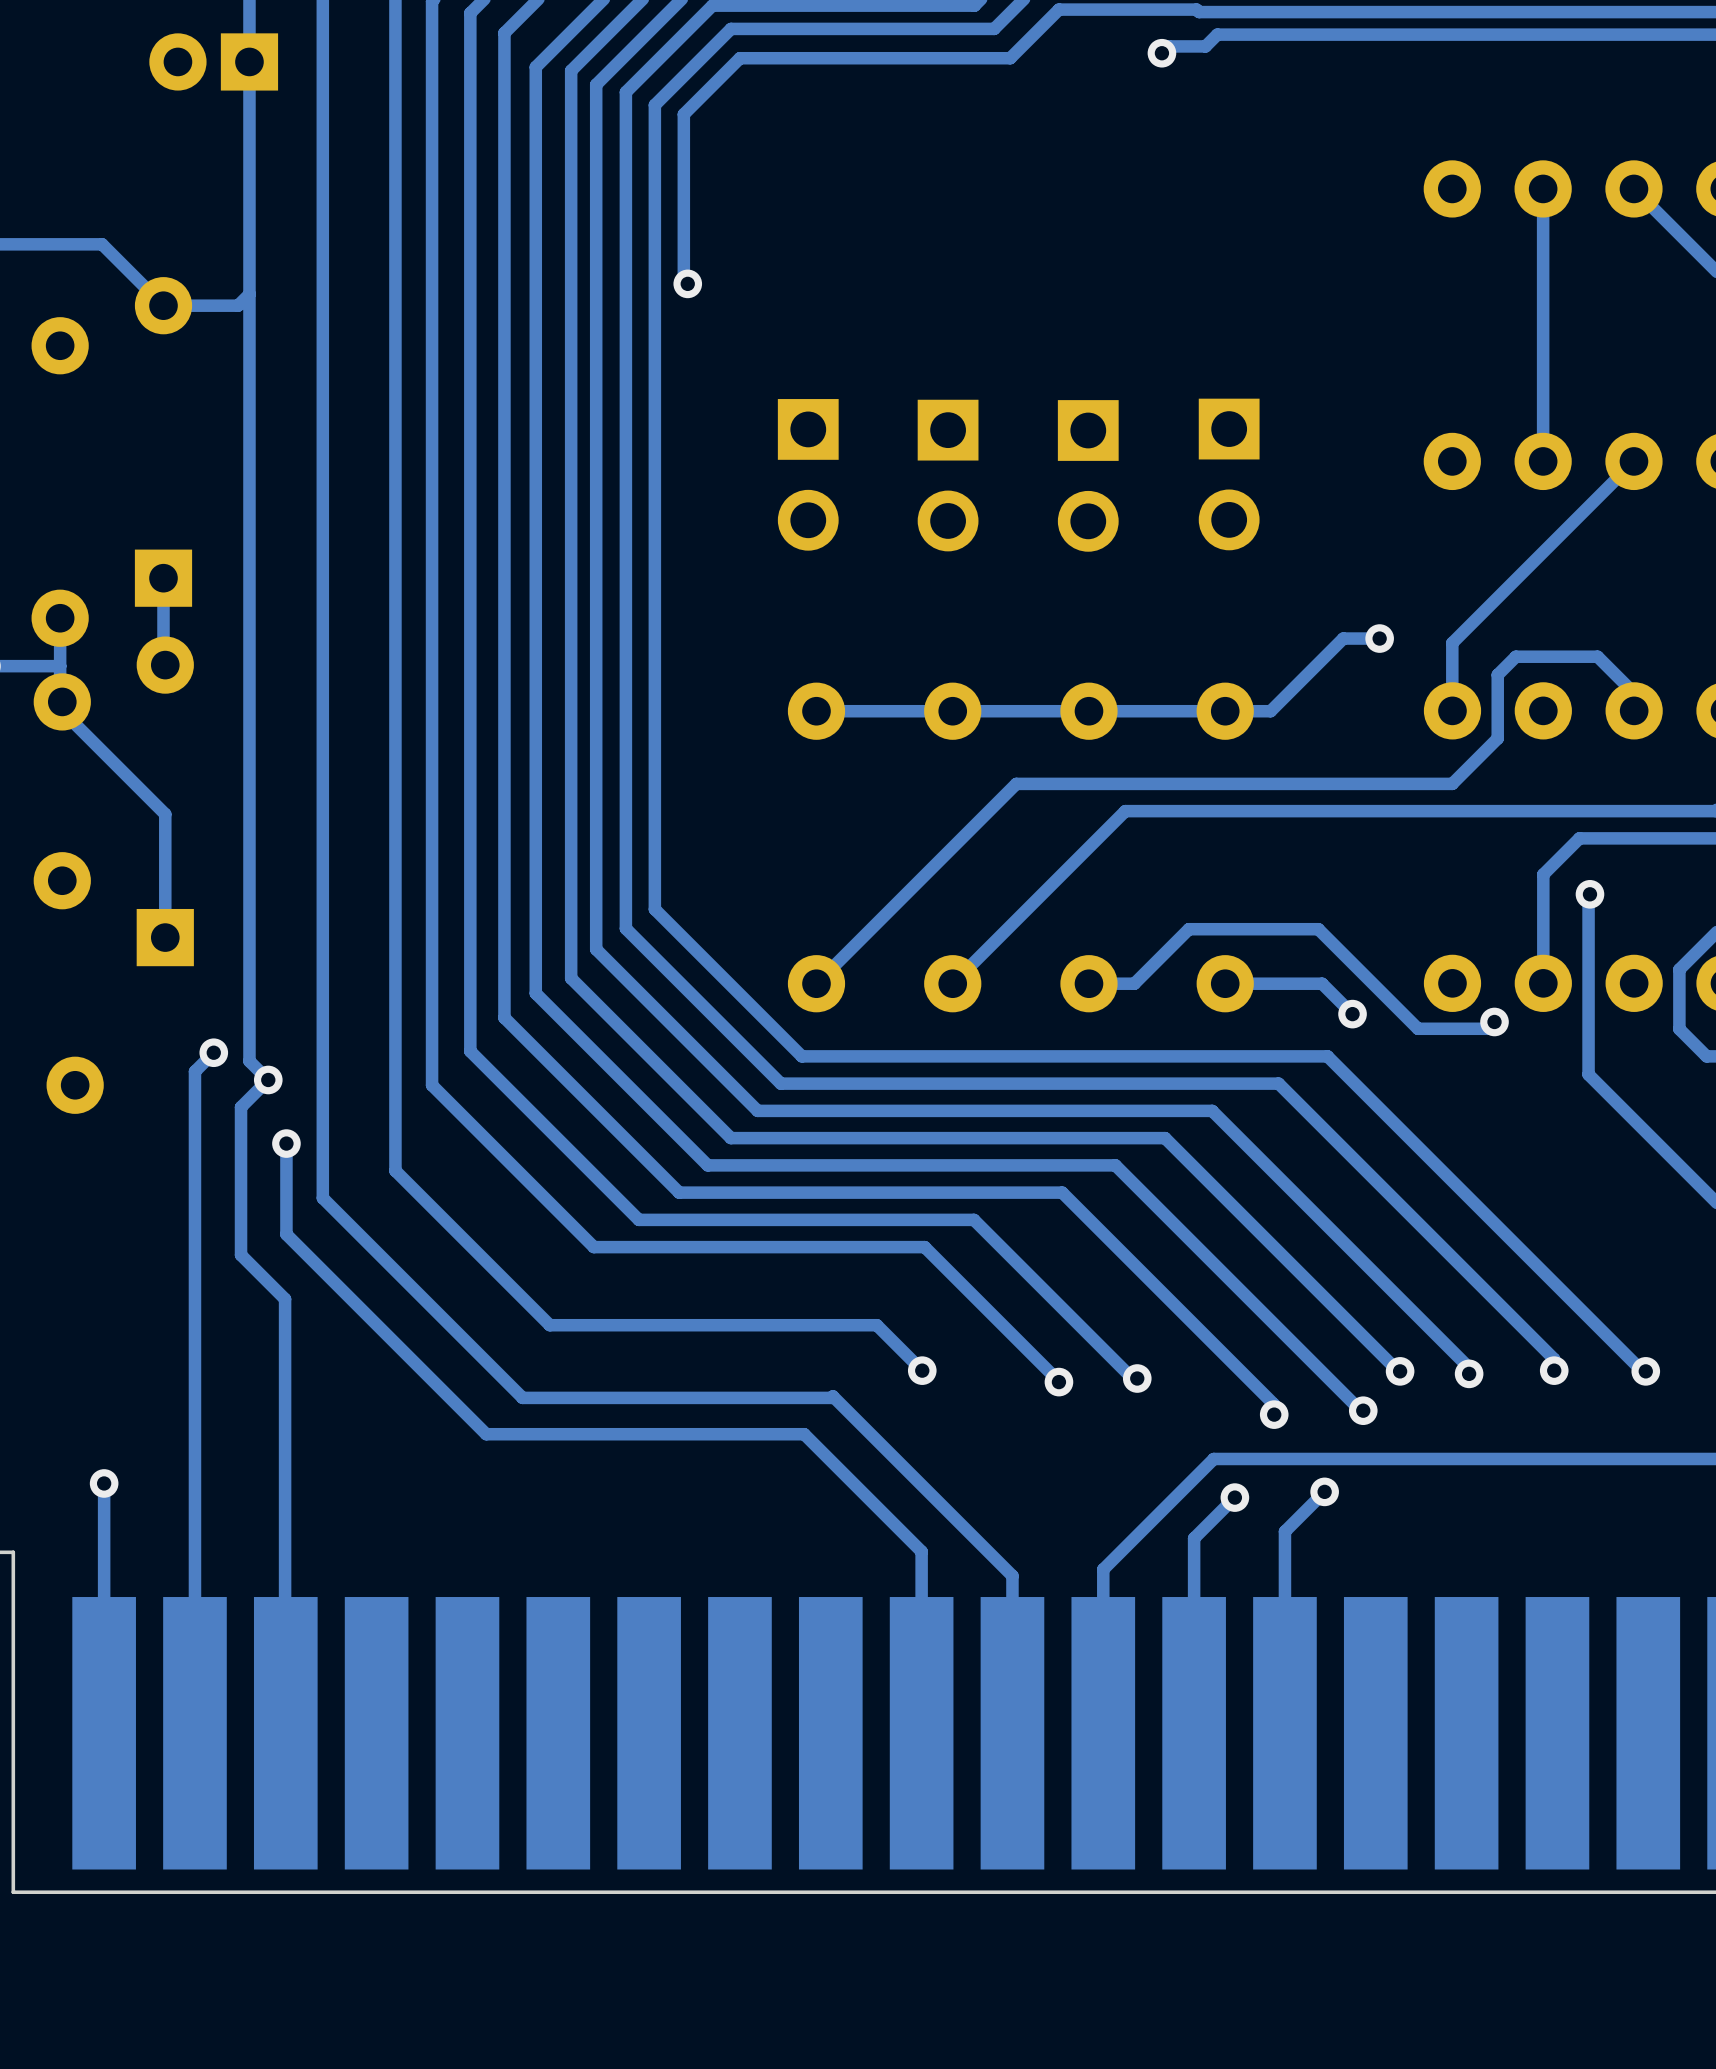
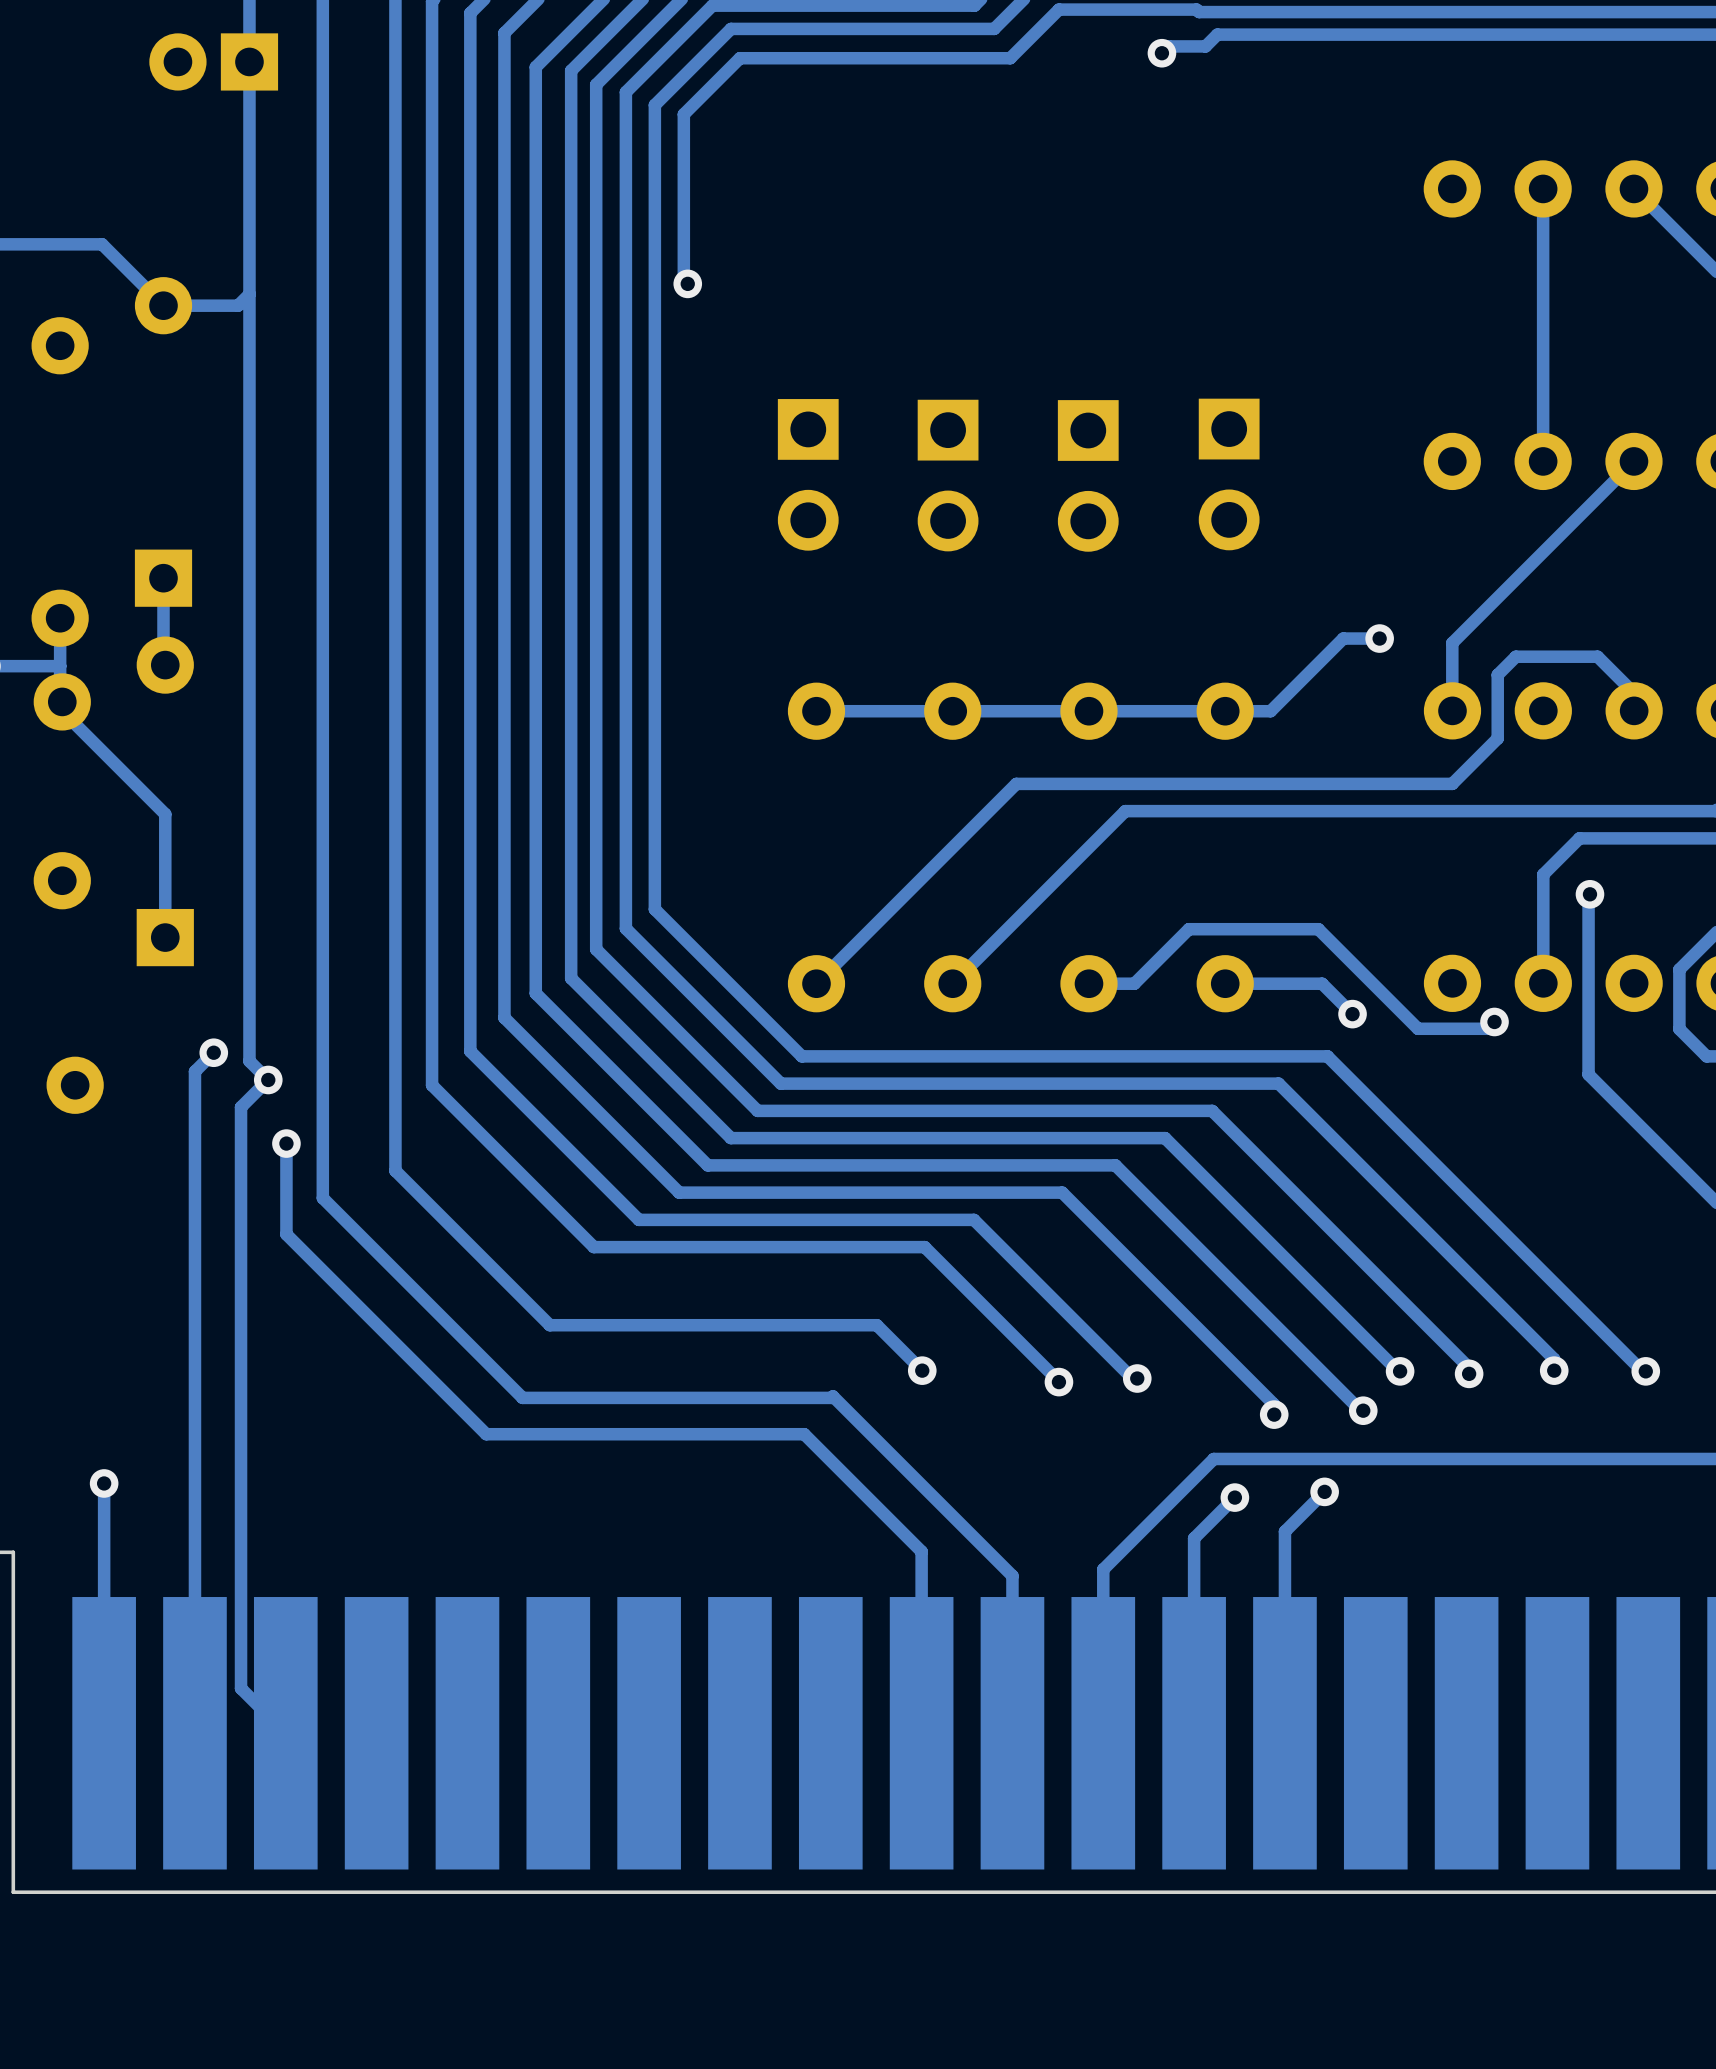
track: (241, 1255) (285, 1299) (285, 1732) -> (241, 1255) (241, 1688) (285, 1732)

